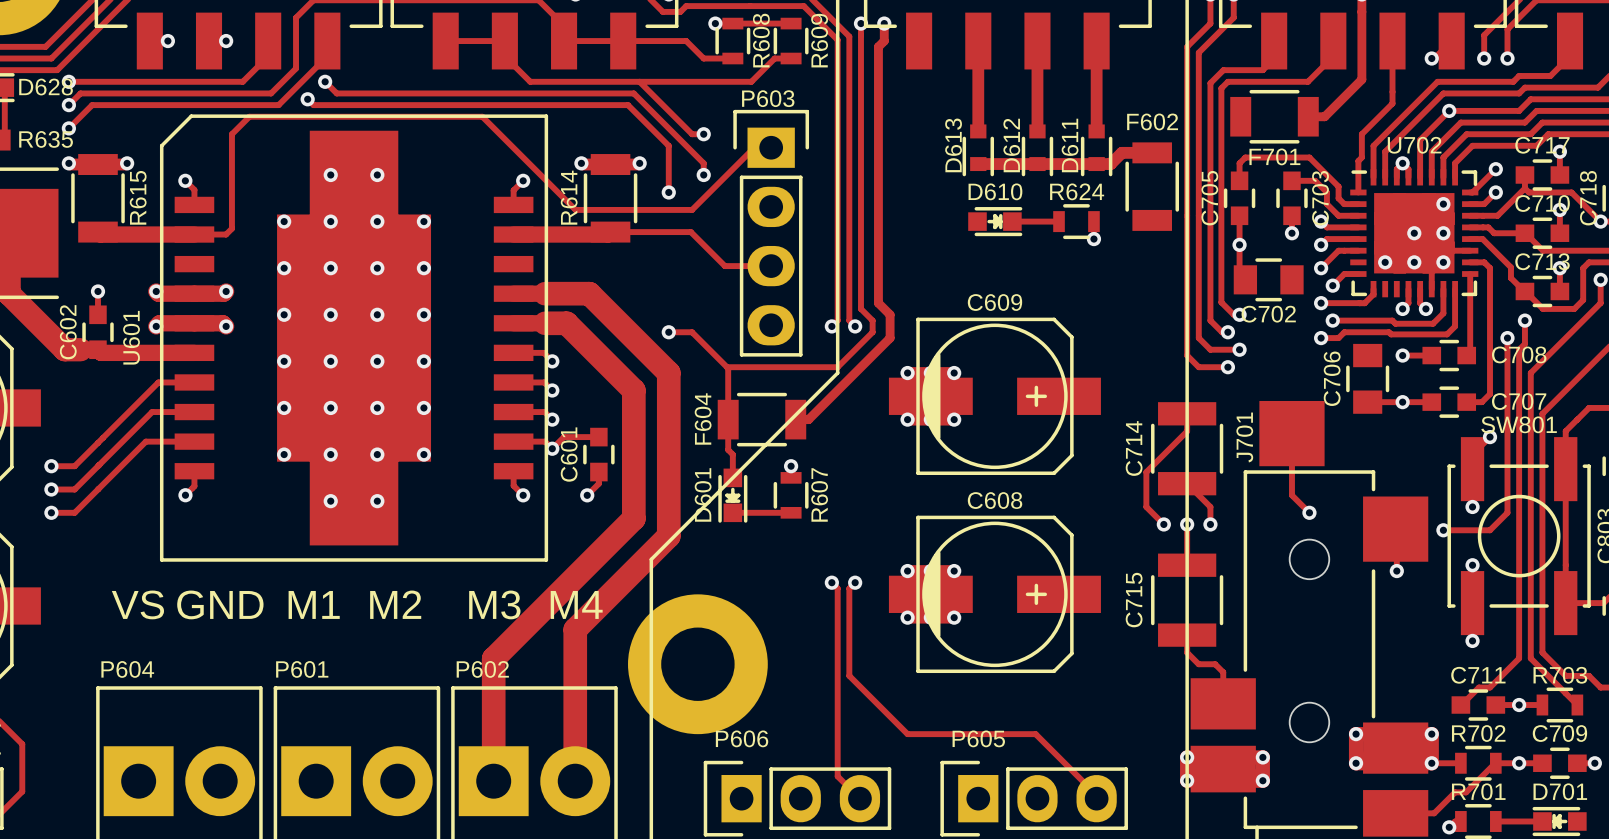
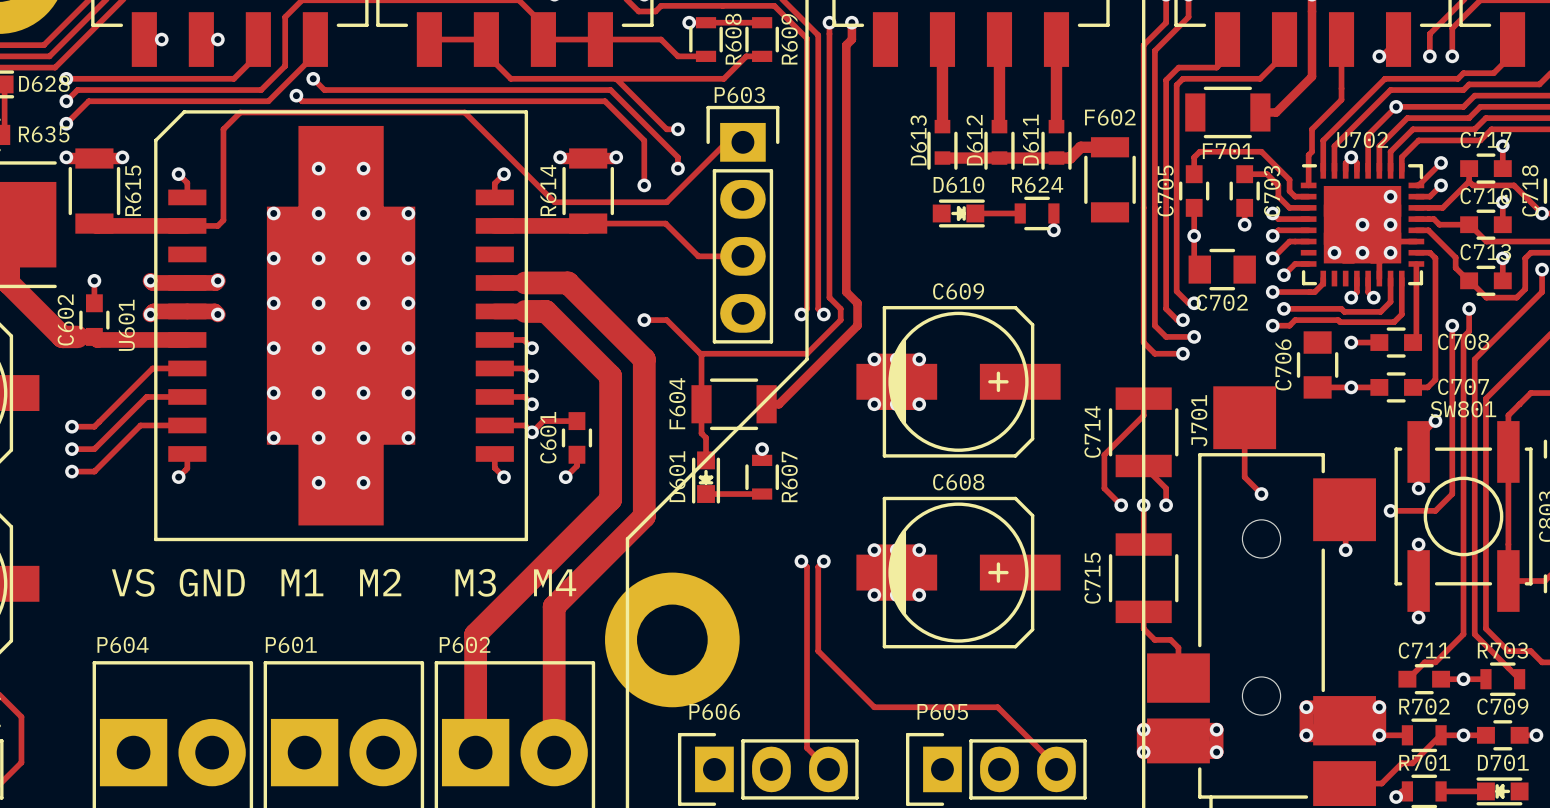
via: none -> (71, 426)
track: (98, 442) (74, 466) (51, 466) -> (94, 426) (71, 426)
via: (51, 466) -> none
via: none -> (71, 449)
track: (98, 466) (74, 489) (51, 489) -> (94, 449) (71, 449)
via: (51, 489) -> none
via: none -> (71, 471)
track: (98, 489) (74, 512) (51, 512) -> (94, 471) (71, 471)
via: (51, 512) -> none

